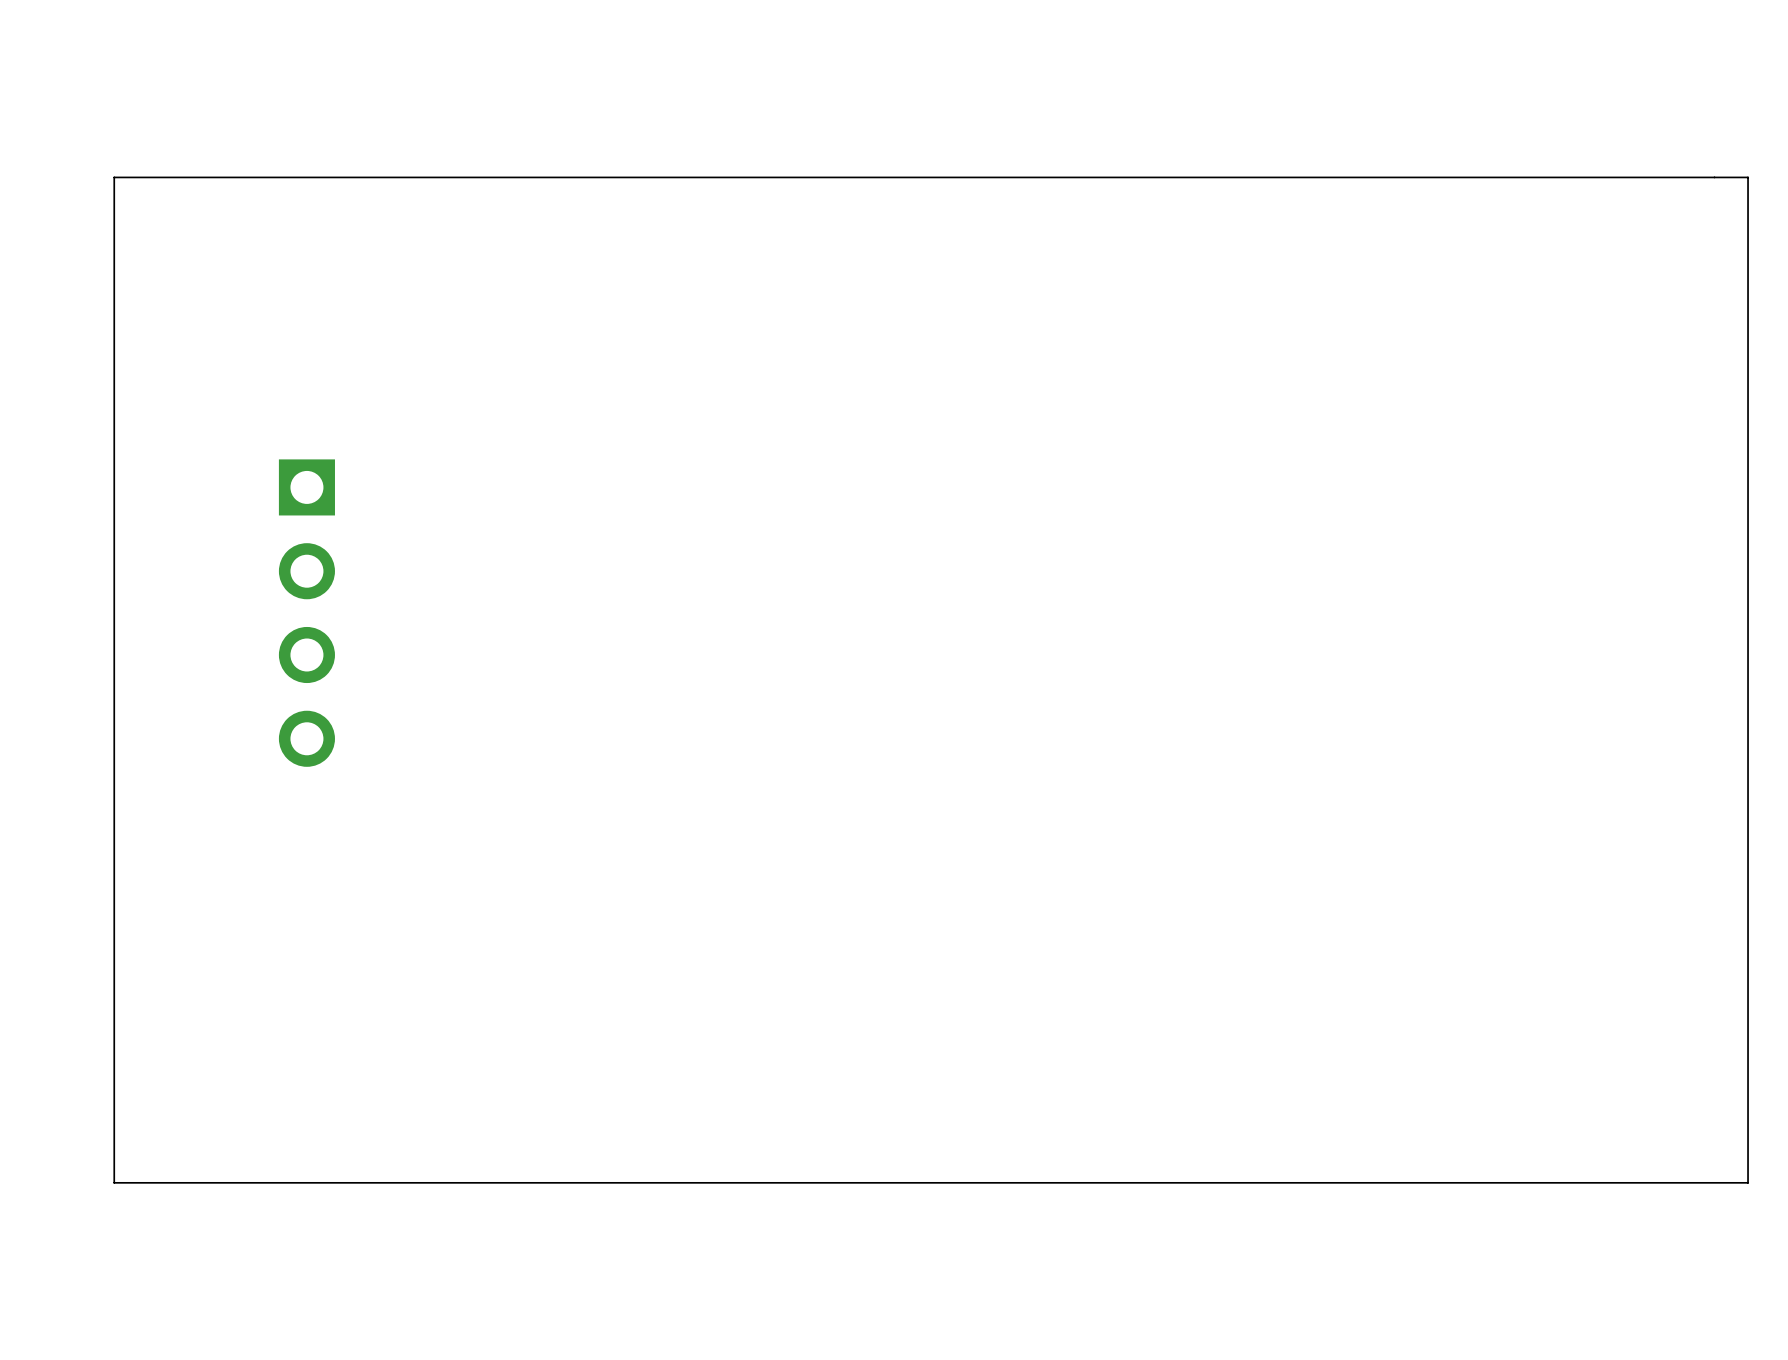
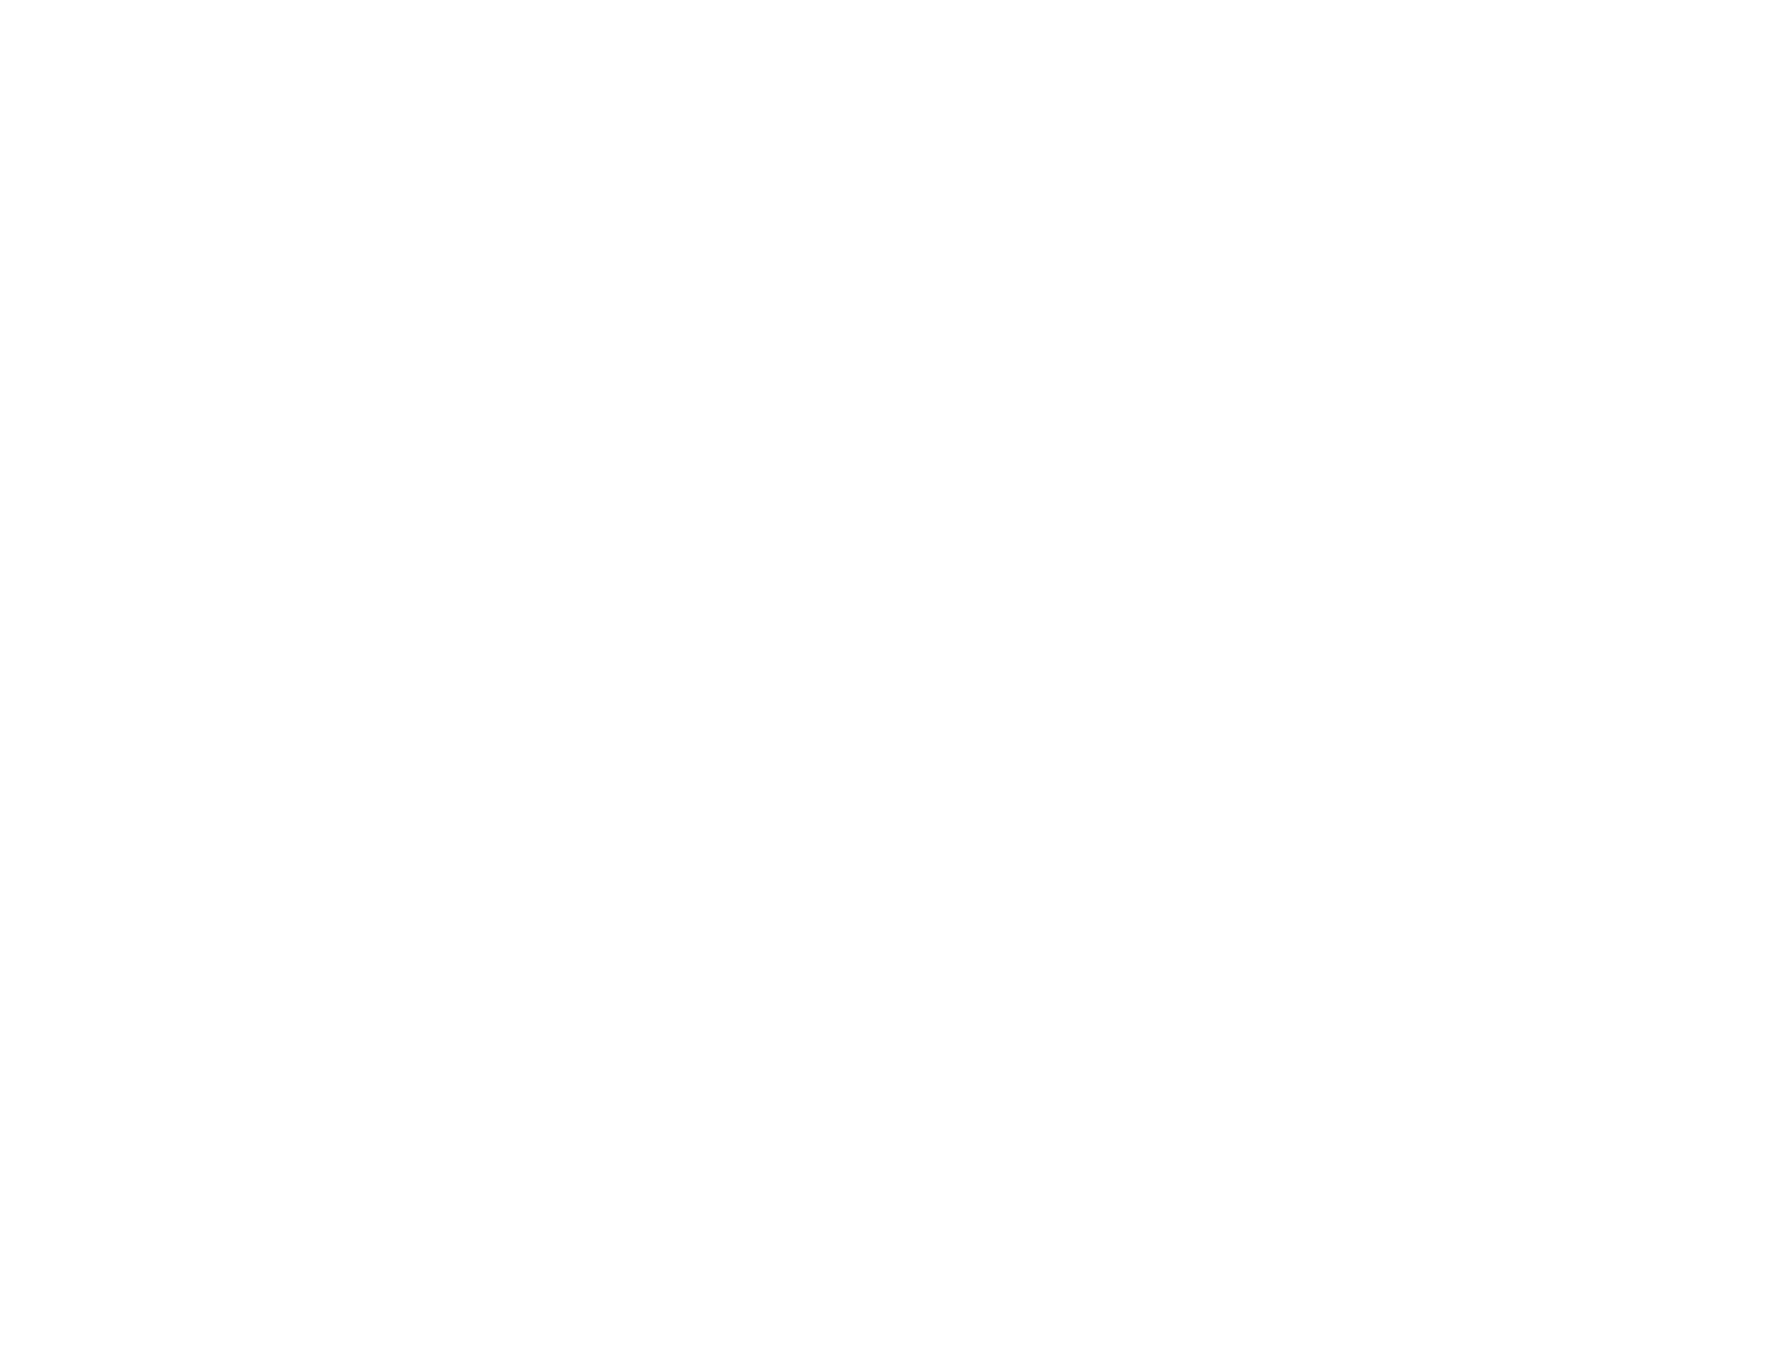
board edge: (1748, 177) (114, 177) (114, 1182) (1748, 1182) (1748, 177) -> none
part: (306, 613) -> none

